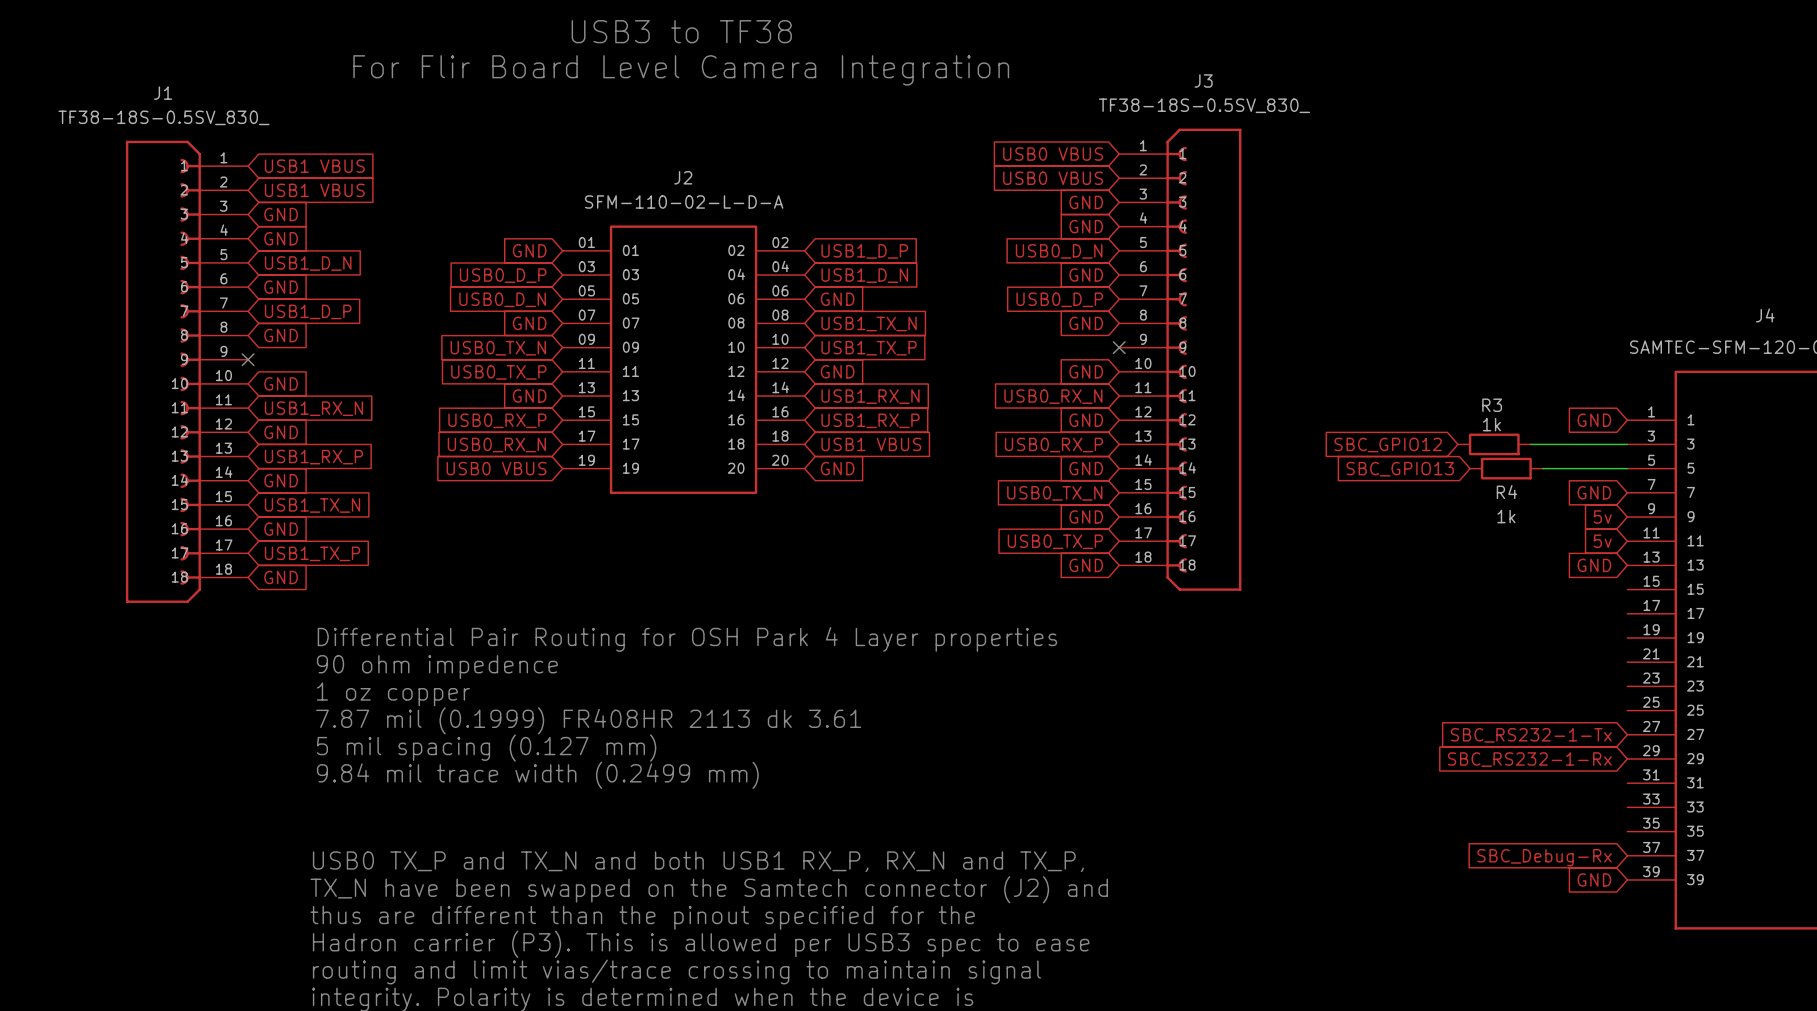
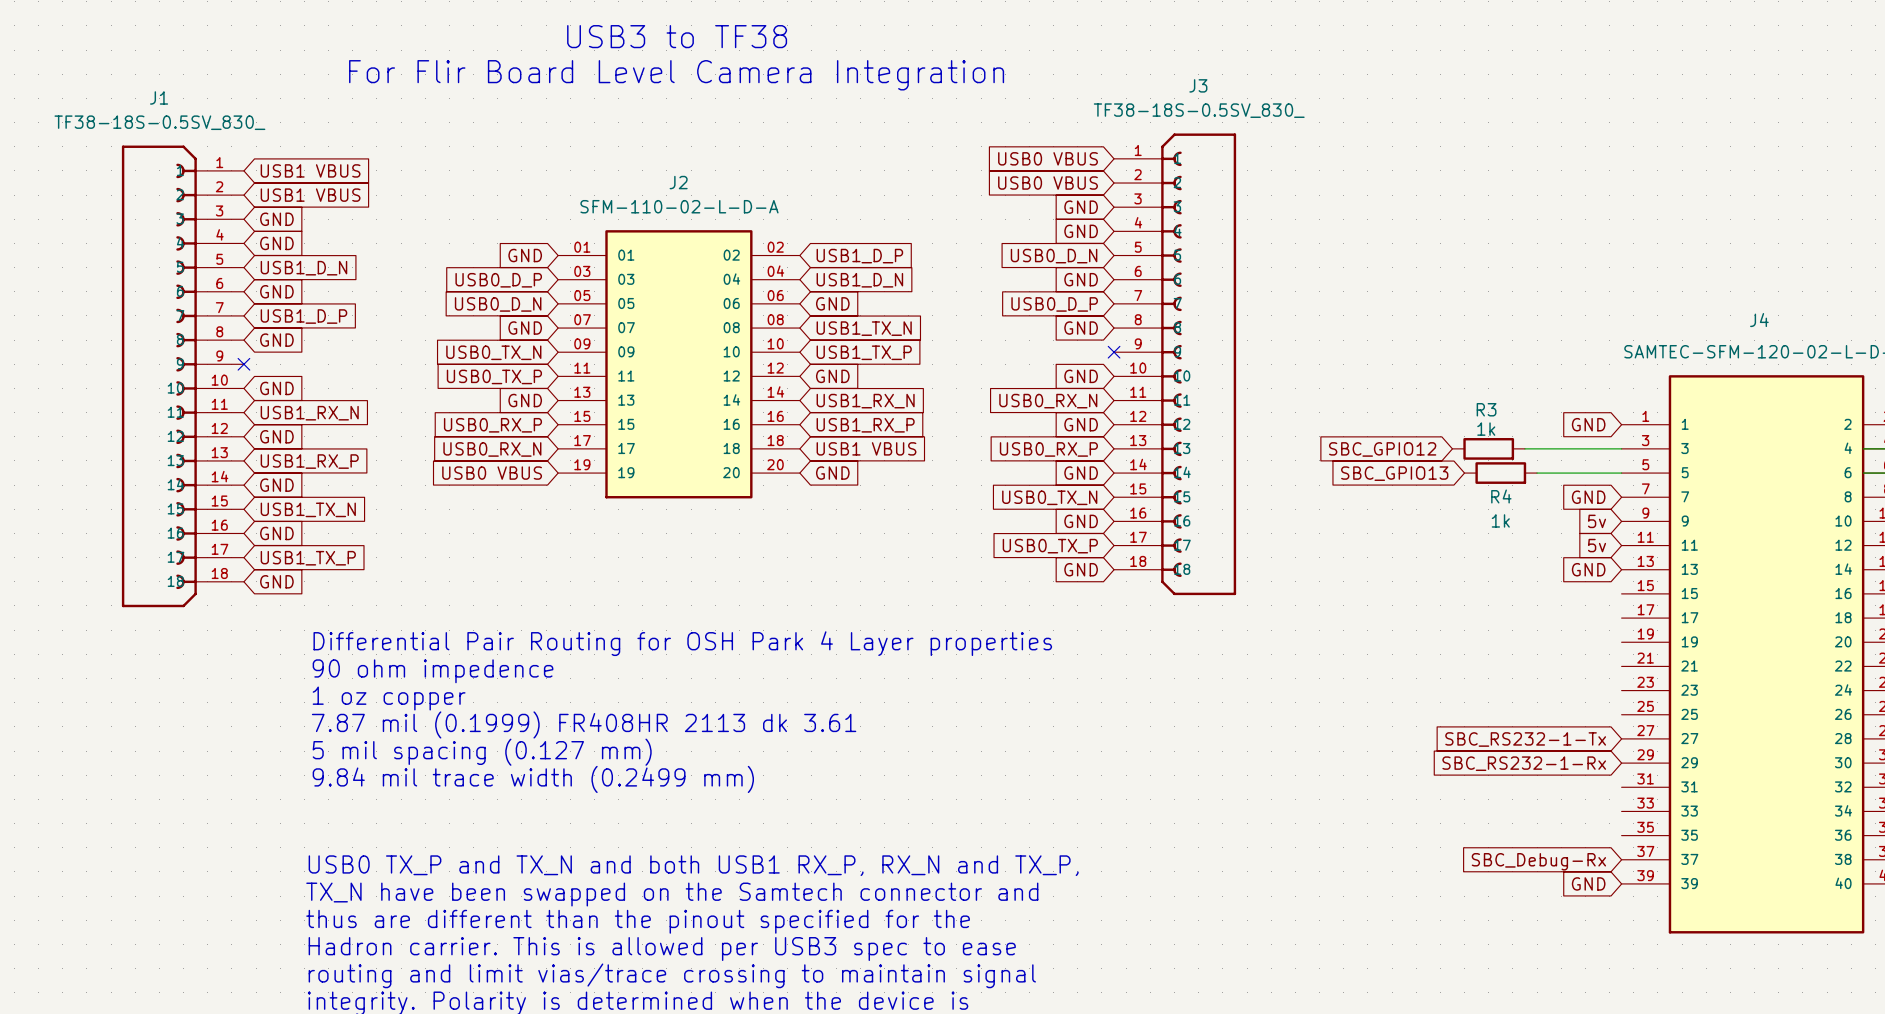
text: TX_N have been swapped on the Samtech connector (J2) and (709, 889) -> TX_N have been swapped on the Samtech connector and (672, 894)
text: Hadron carrier (P3). This is allowed per USB3 spec to ease (701, 944) -> Hadron carrier. This is allowed per USB3 spec to ease (662, 949)

